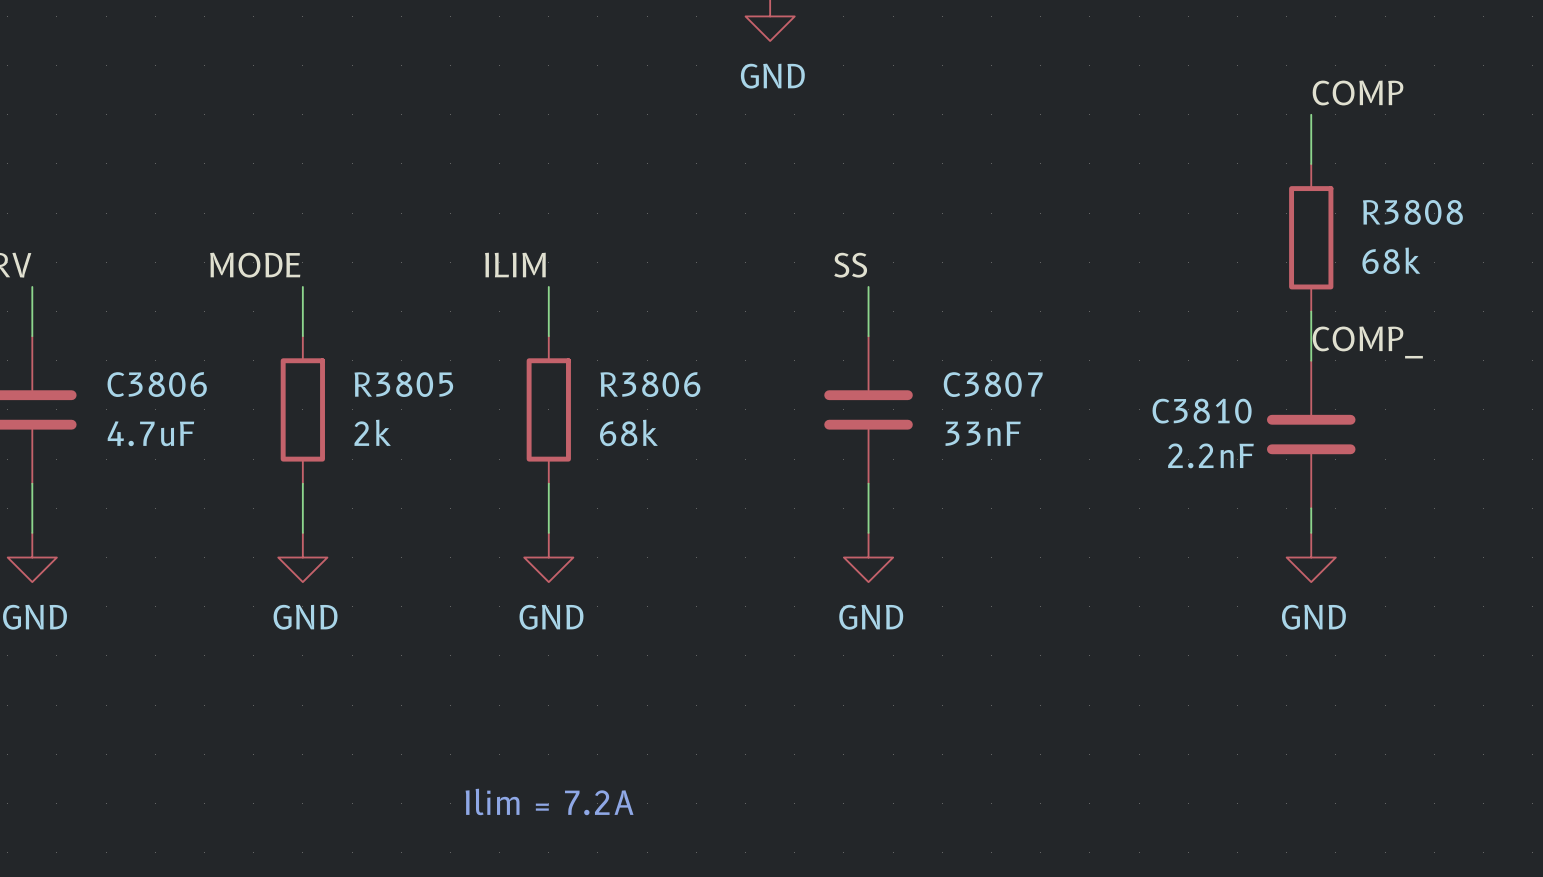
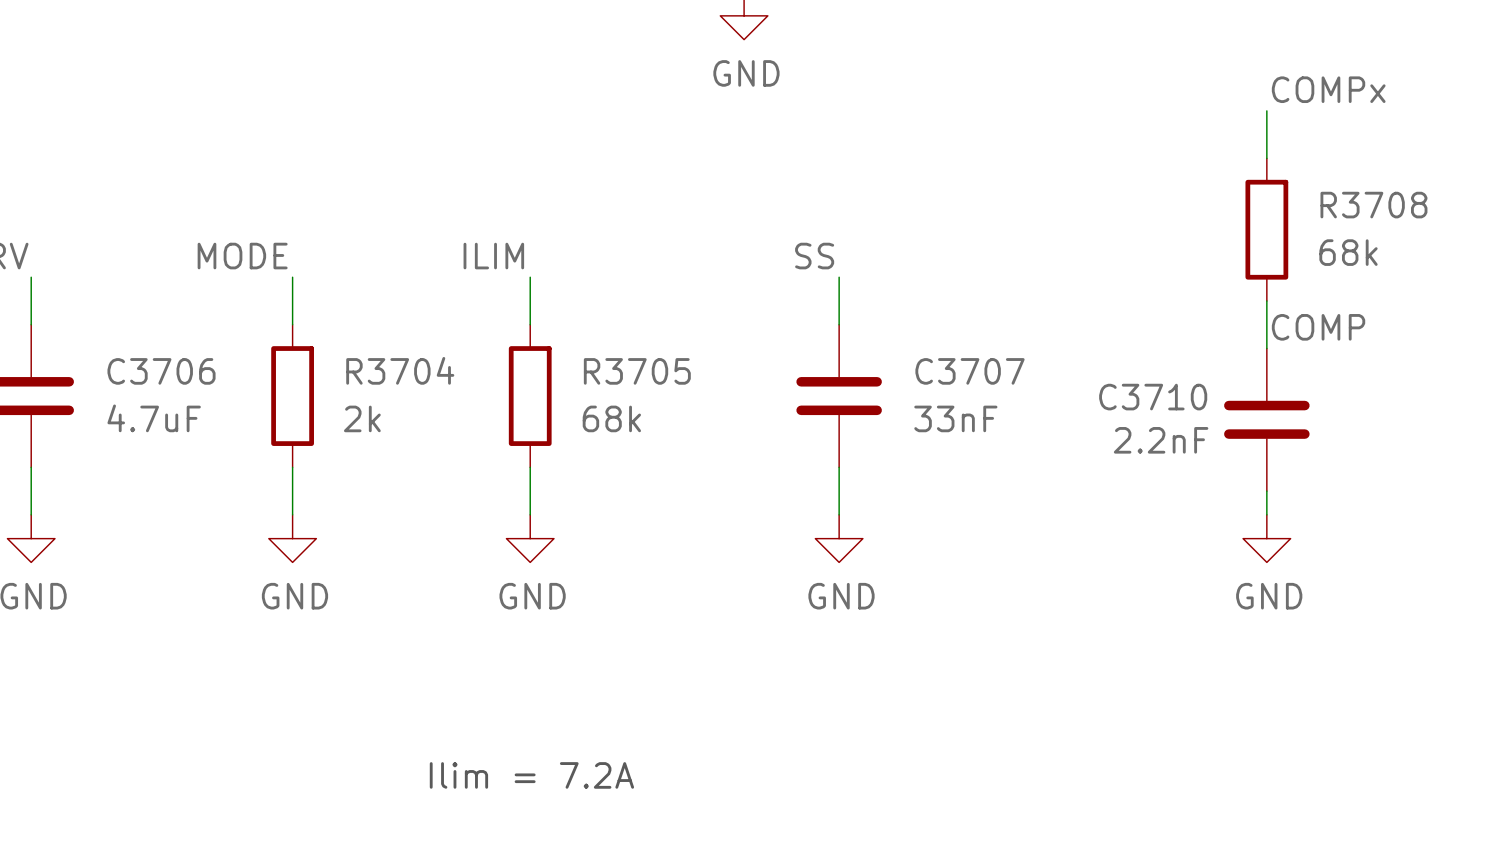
label: COMP (1358, 92) -> COMPx (1328, 89)
R3808 name: R3808 (1412, 212) -> R3708 (1373, 205)
label: COMP_ (1367, 342) -> COMP (1318, 327)
C3806 name: C3806 (157, 384) -> C3706 (161, 371)
R3805 name: R3805 (403, 384) -> R3704 (400, 370)
R3806 name: R3806 (650, 384) -> R3705 (637, 371)
C3807 name: C3807 (993, 384) -> C3707 (970, 371)
C3810 name: C3810 (1202, 411) -> C3710 (1153, 397)

